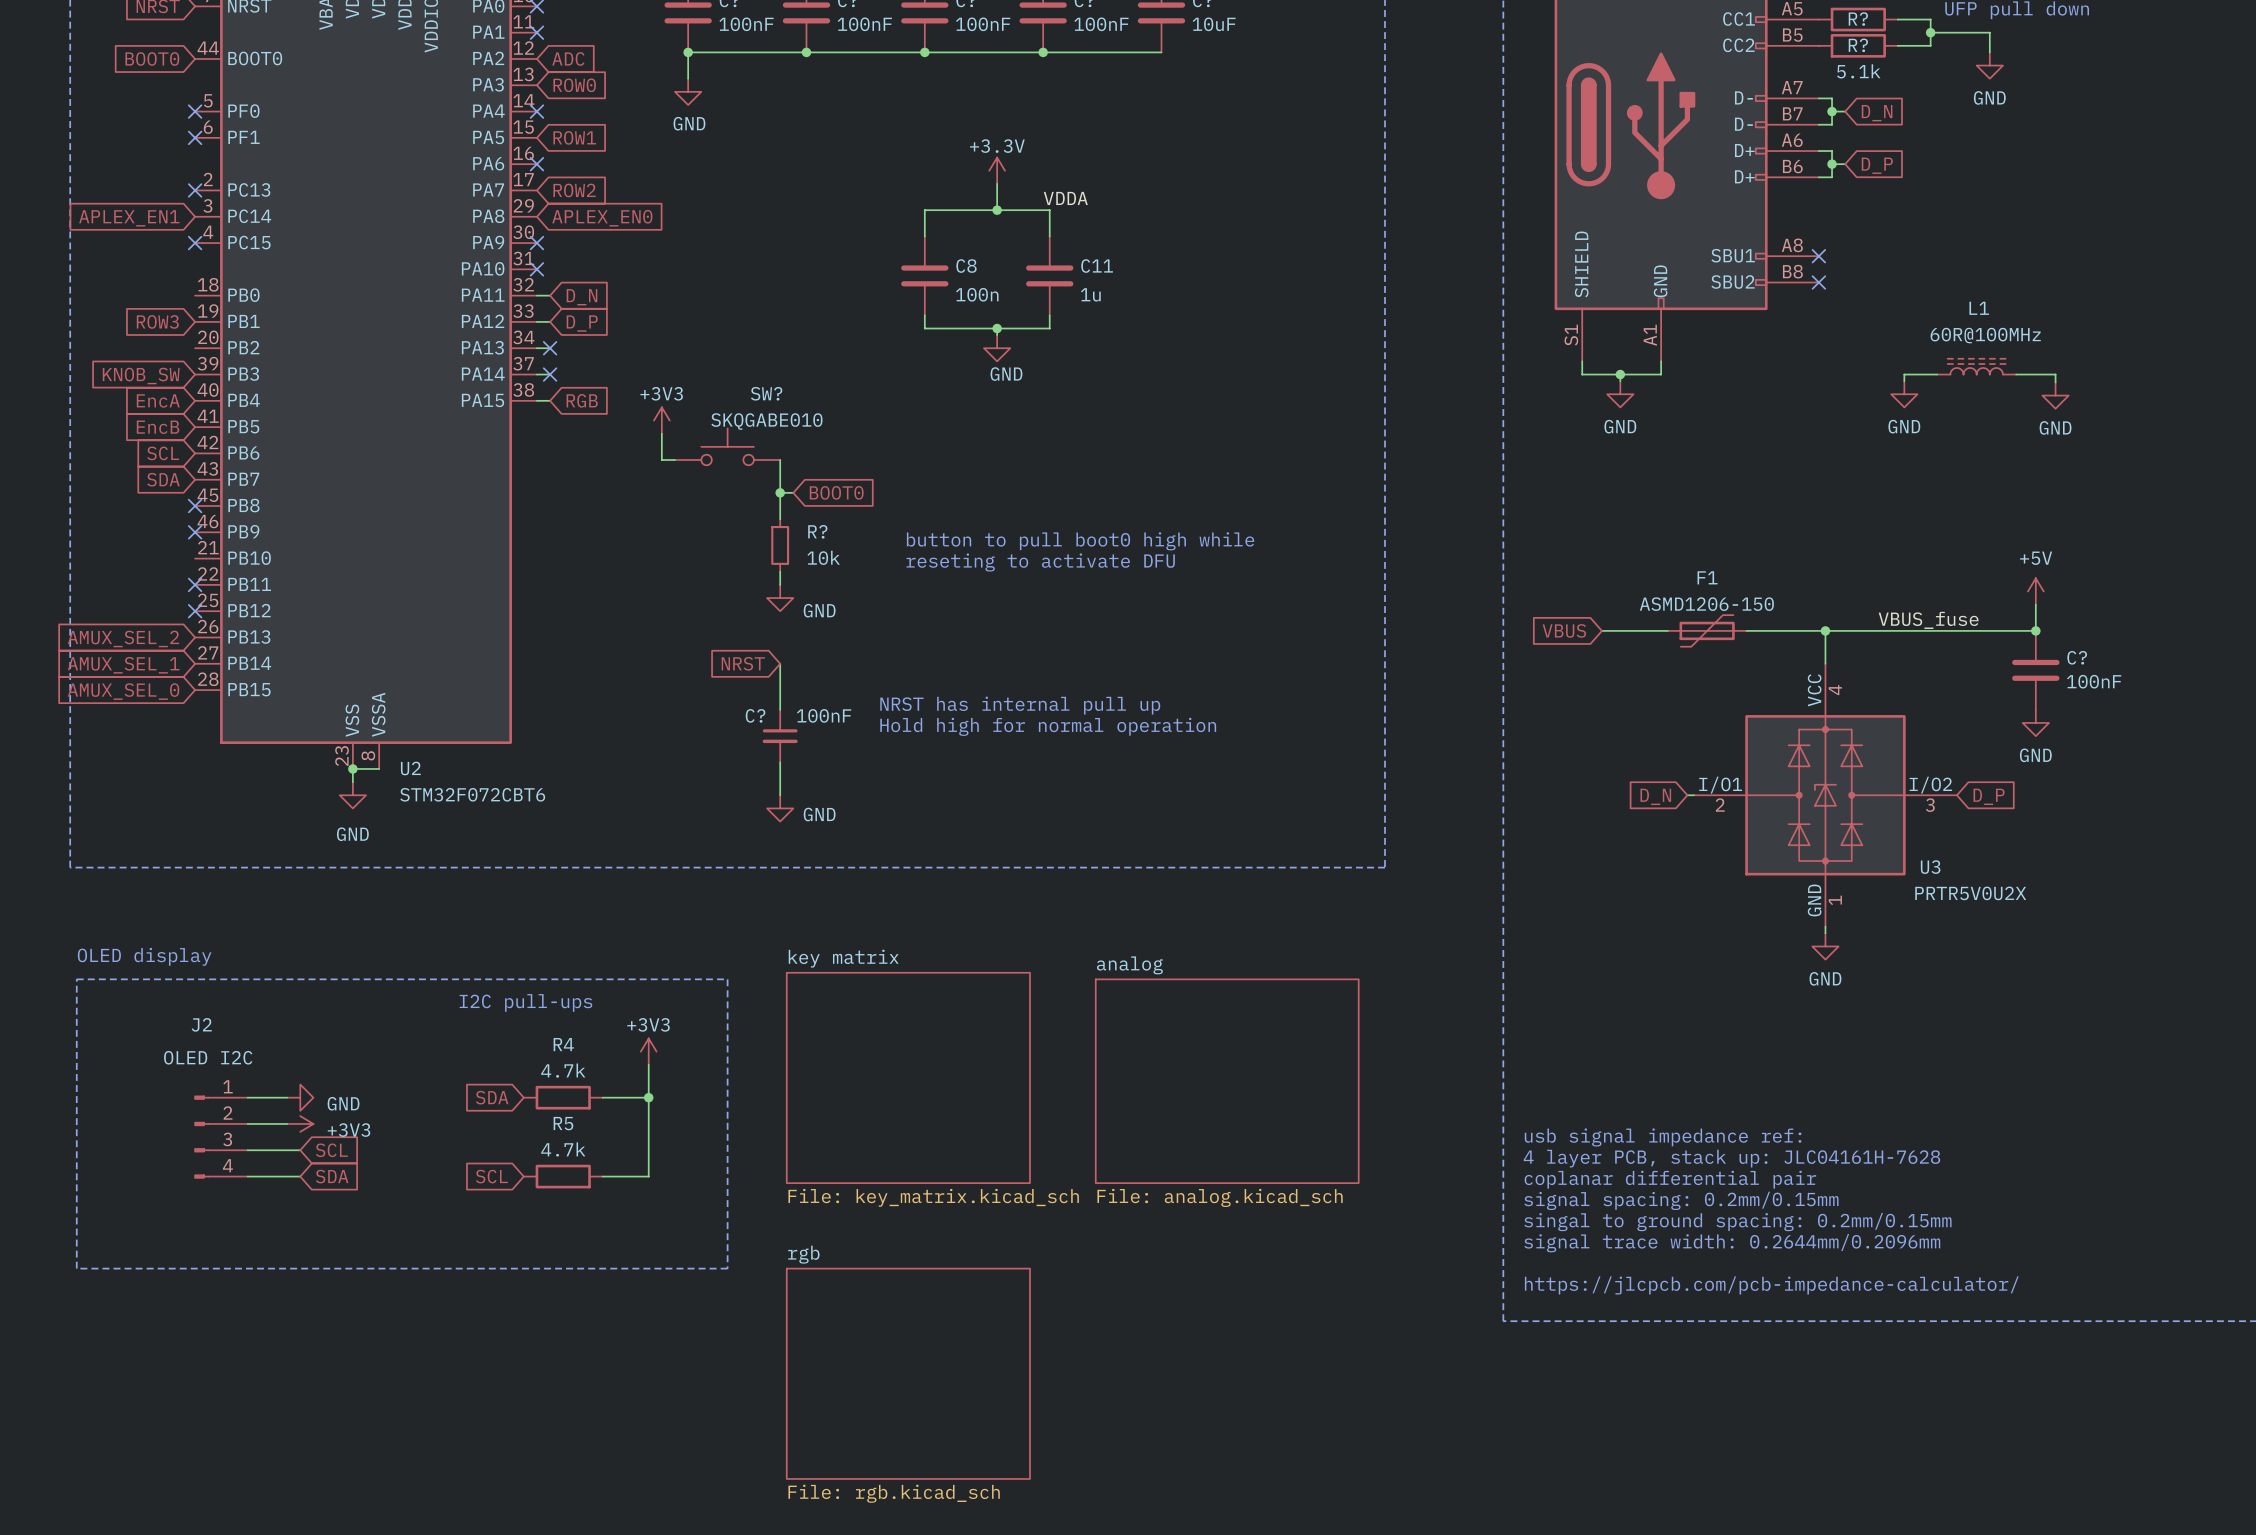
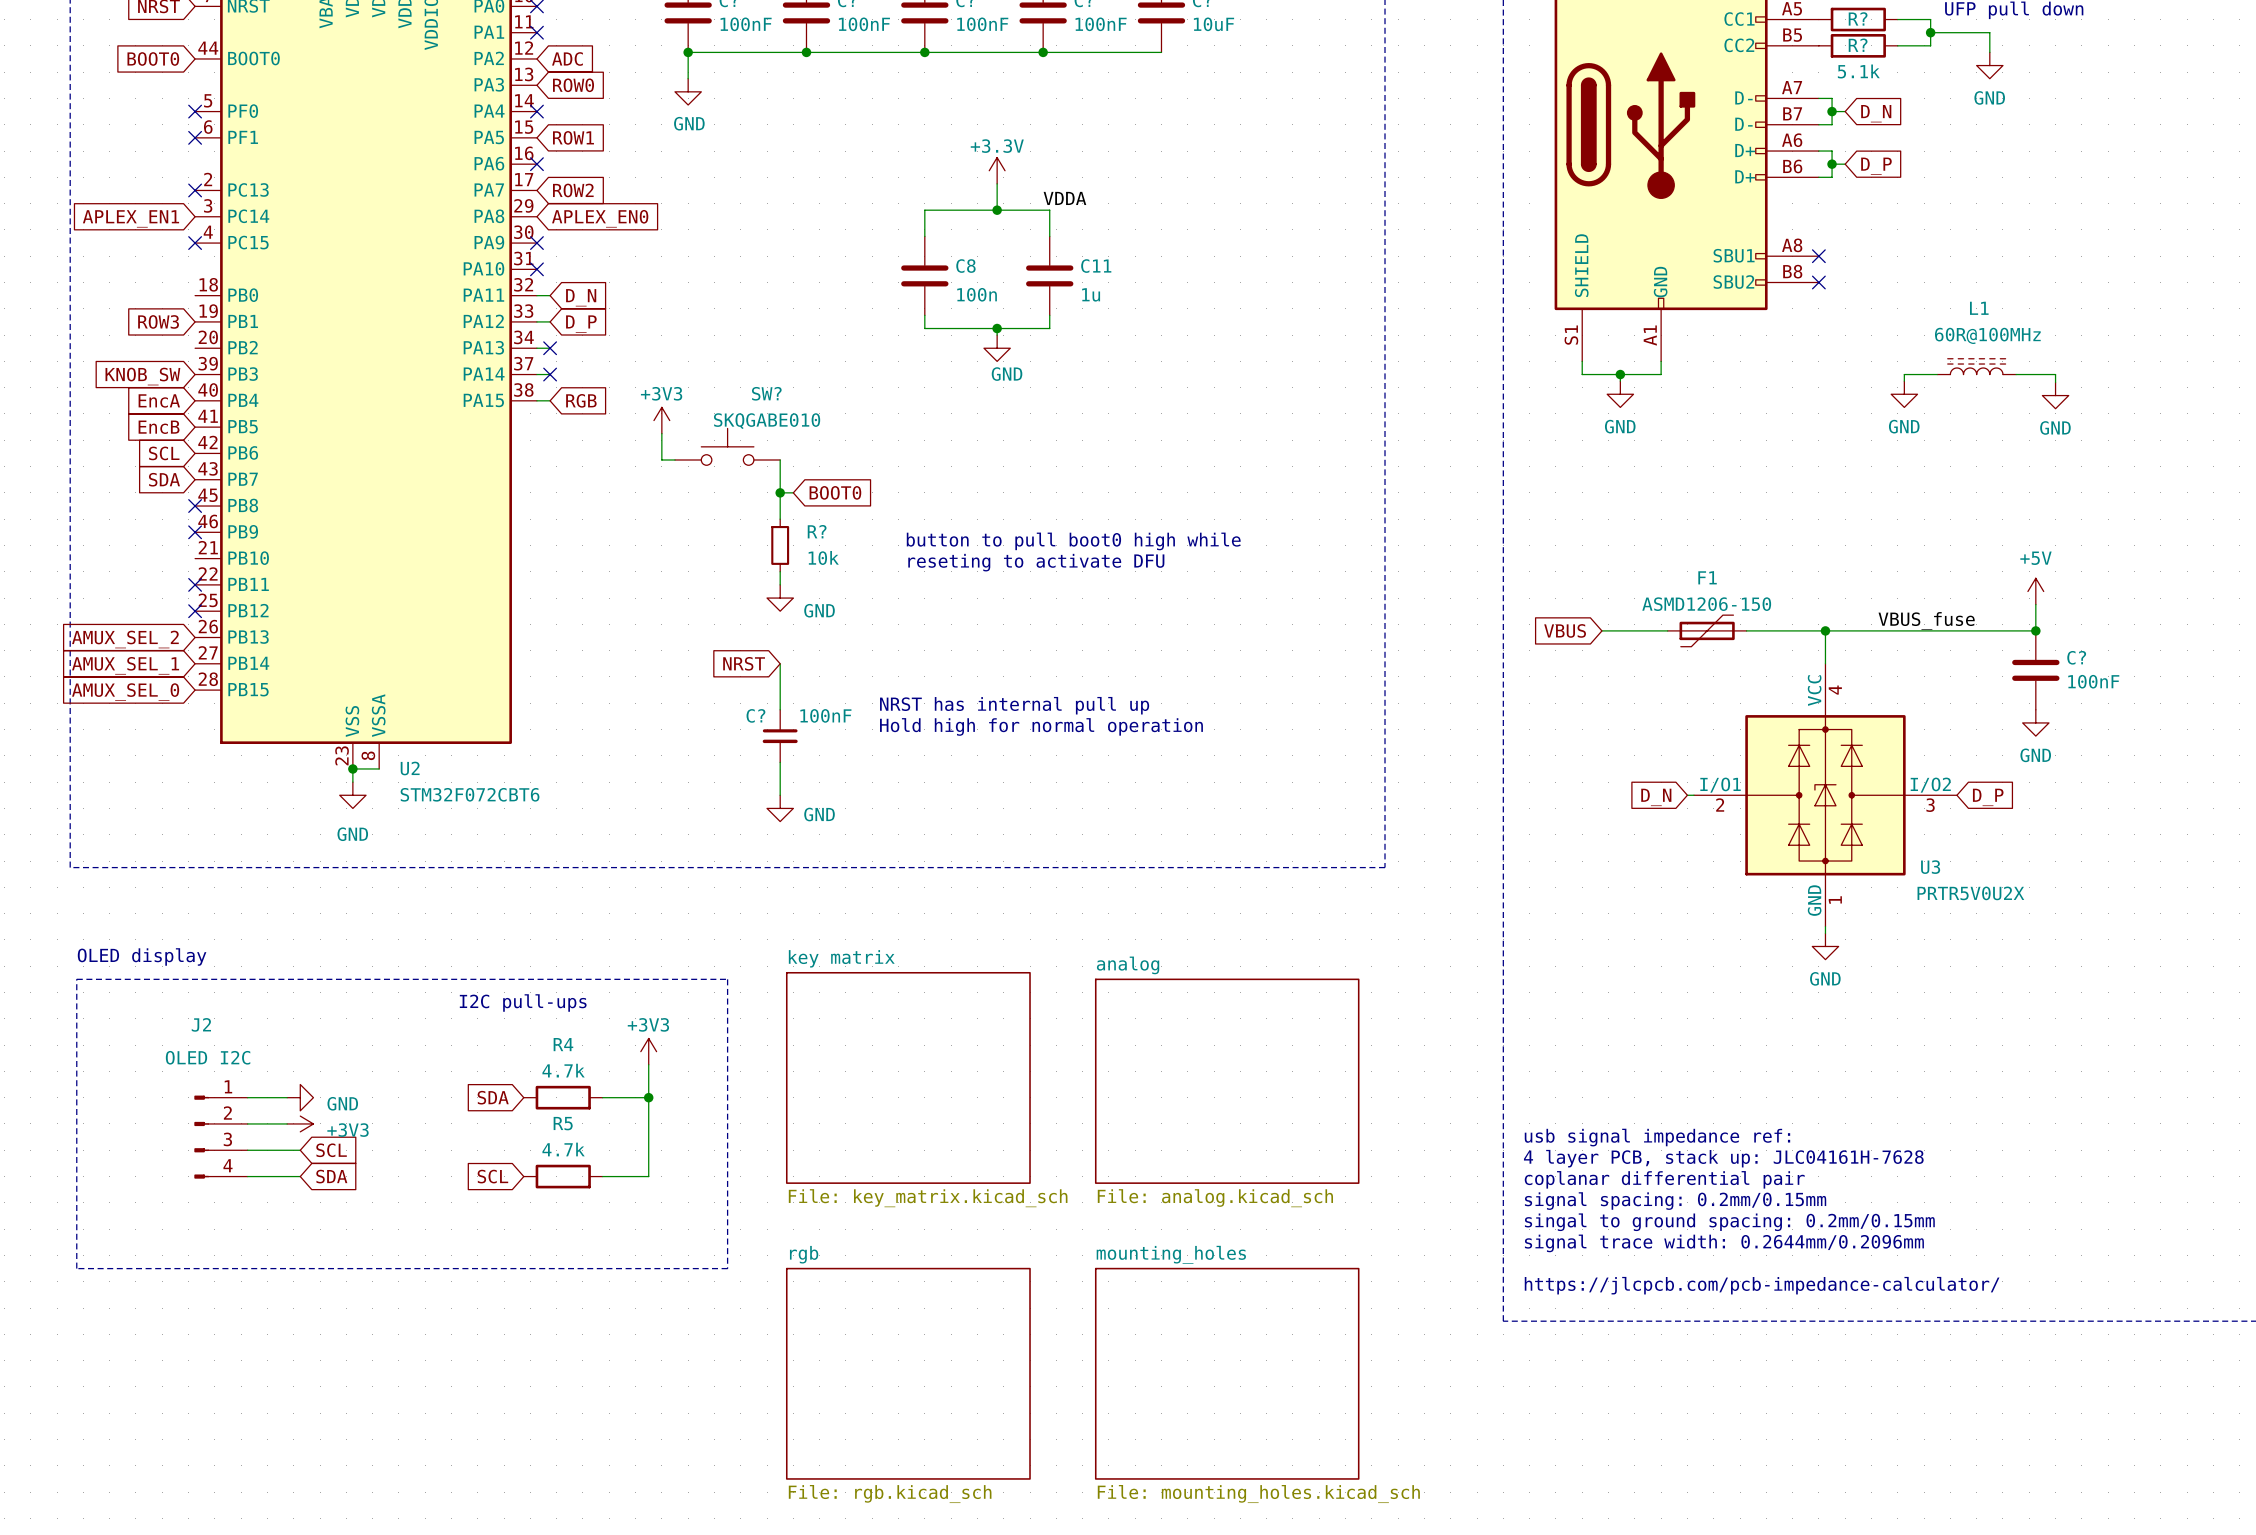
sheet mounting_holes: none -> File: mounting_holes.kicad_sch (1227, 1373)

